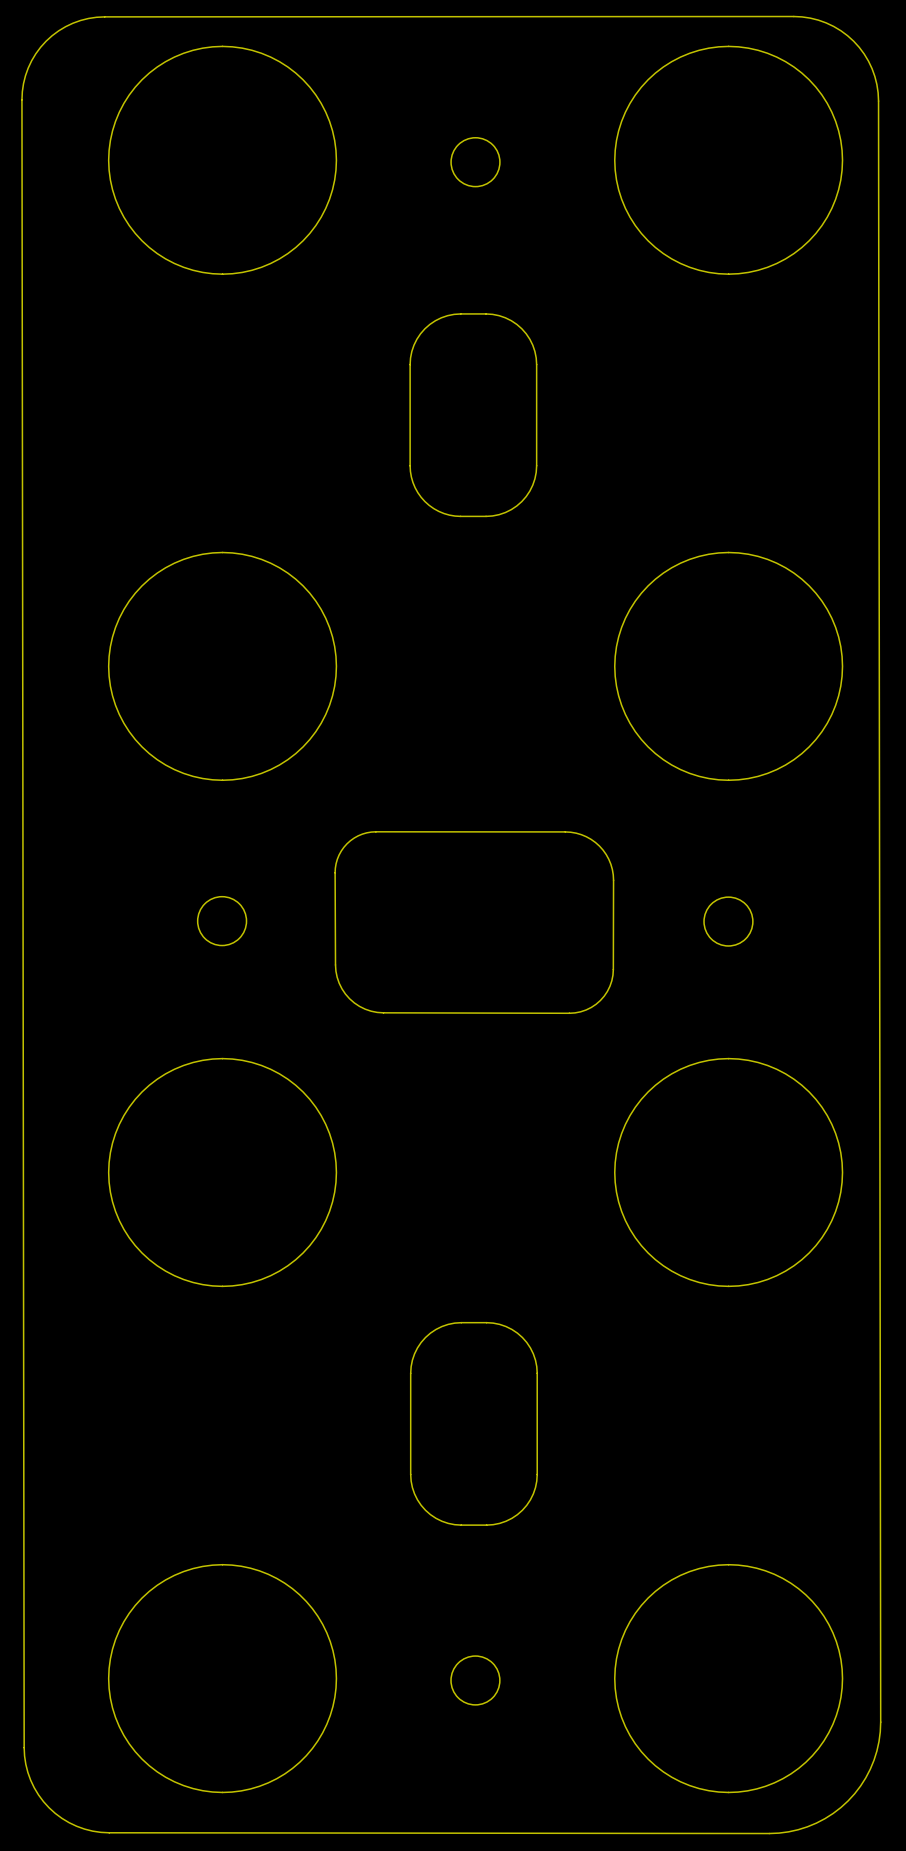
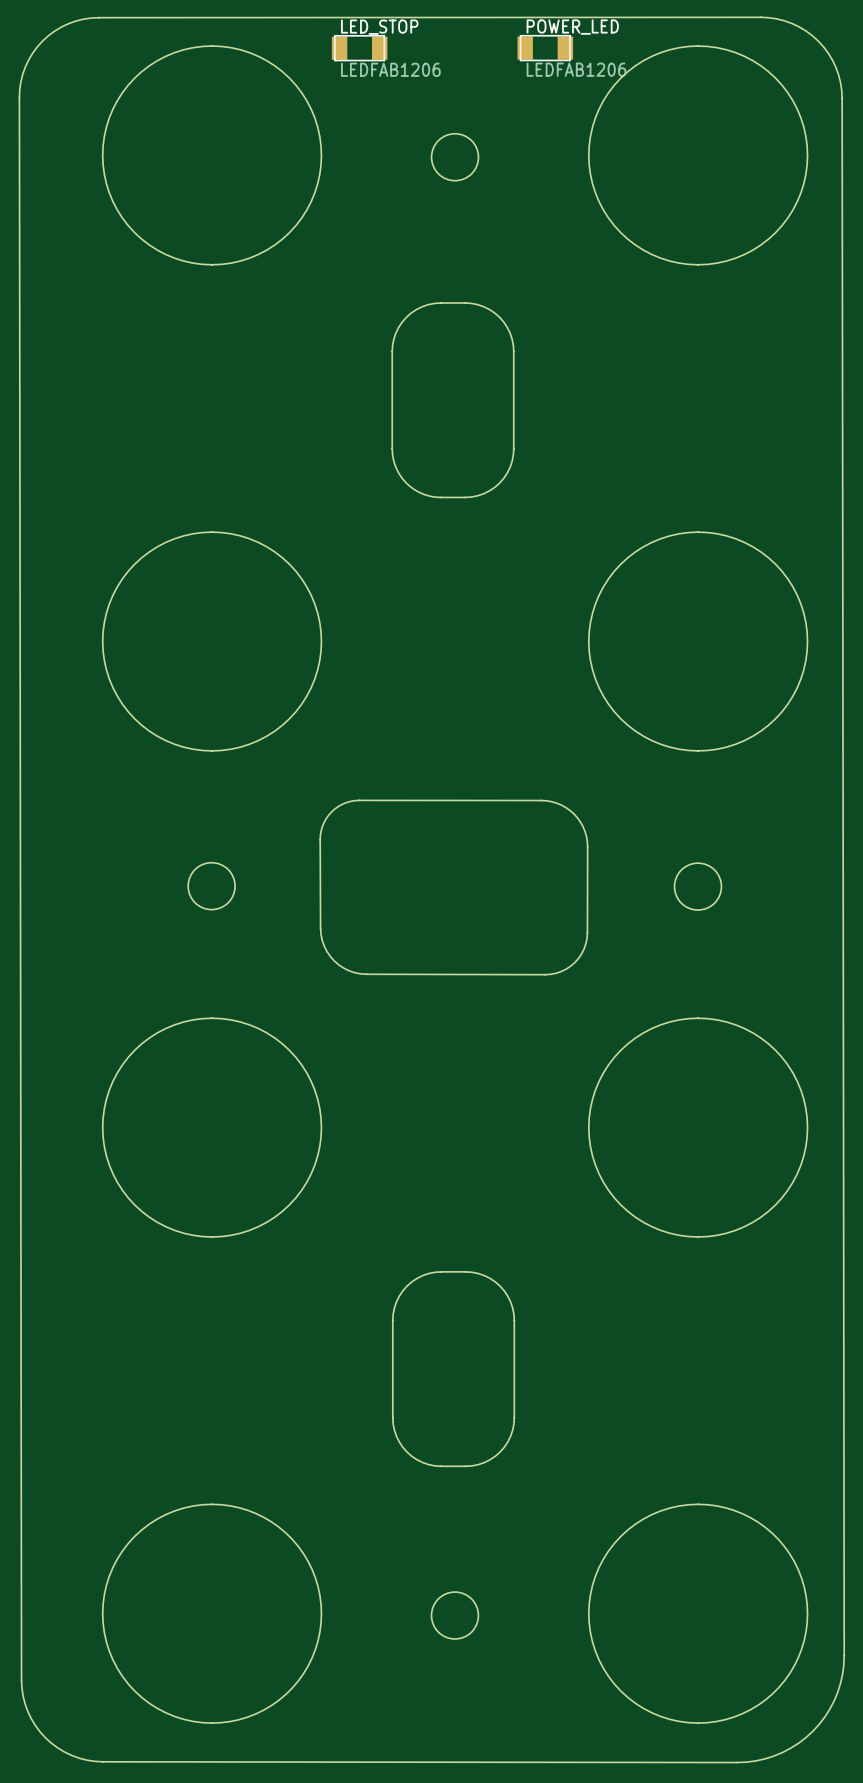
LED_STOP: none -> LEDFAB1206 (359, 48)
POWER_LED: none -> LEDFAB1206 (545, 48)

